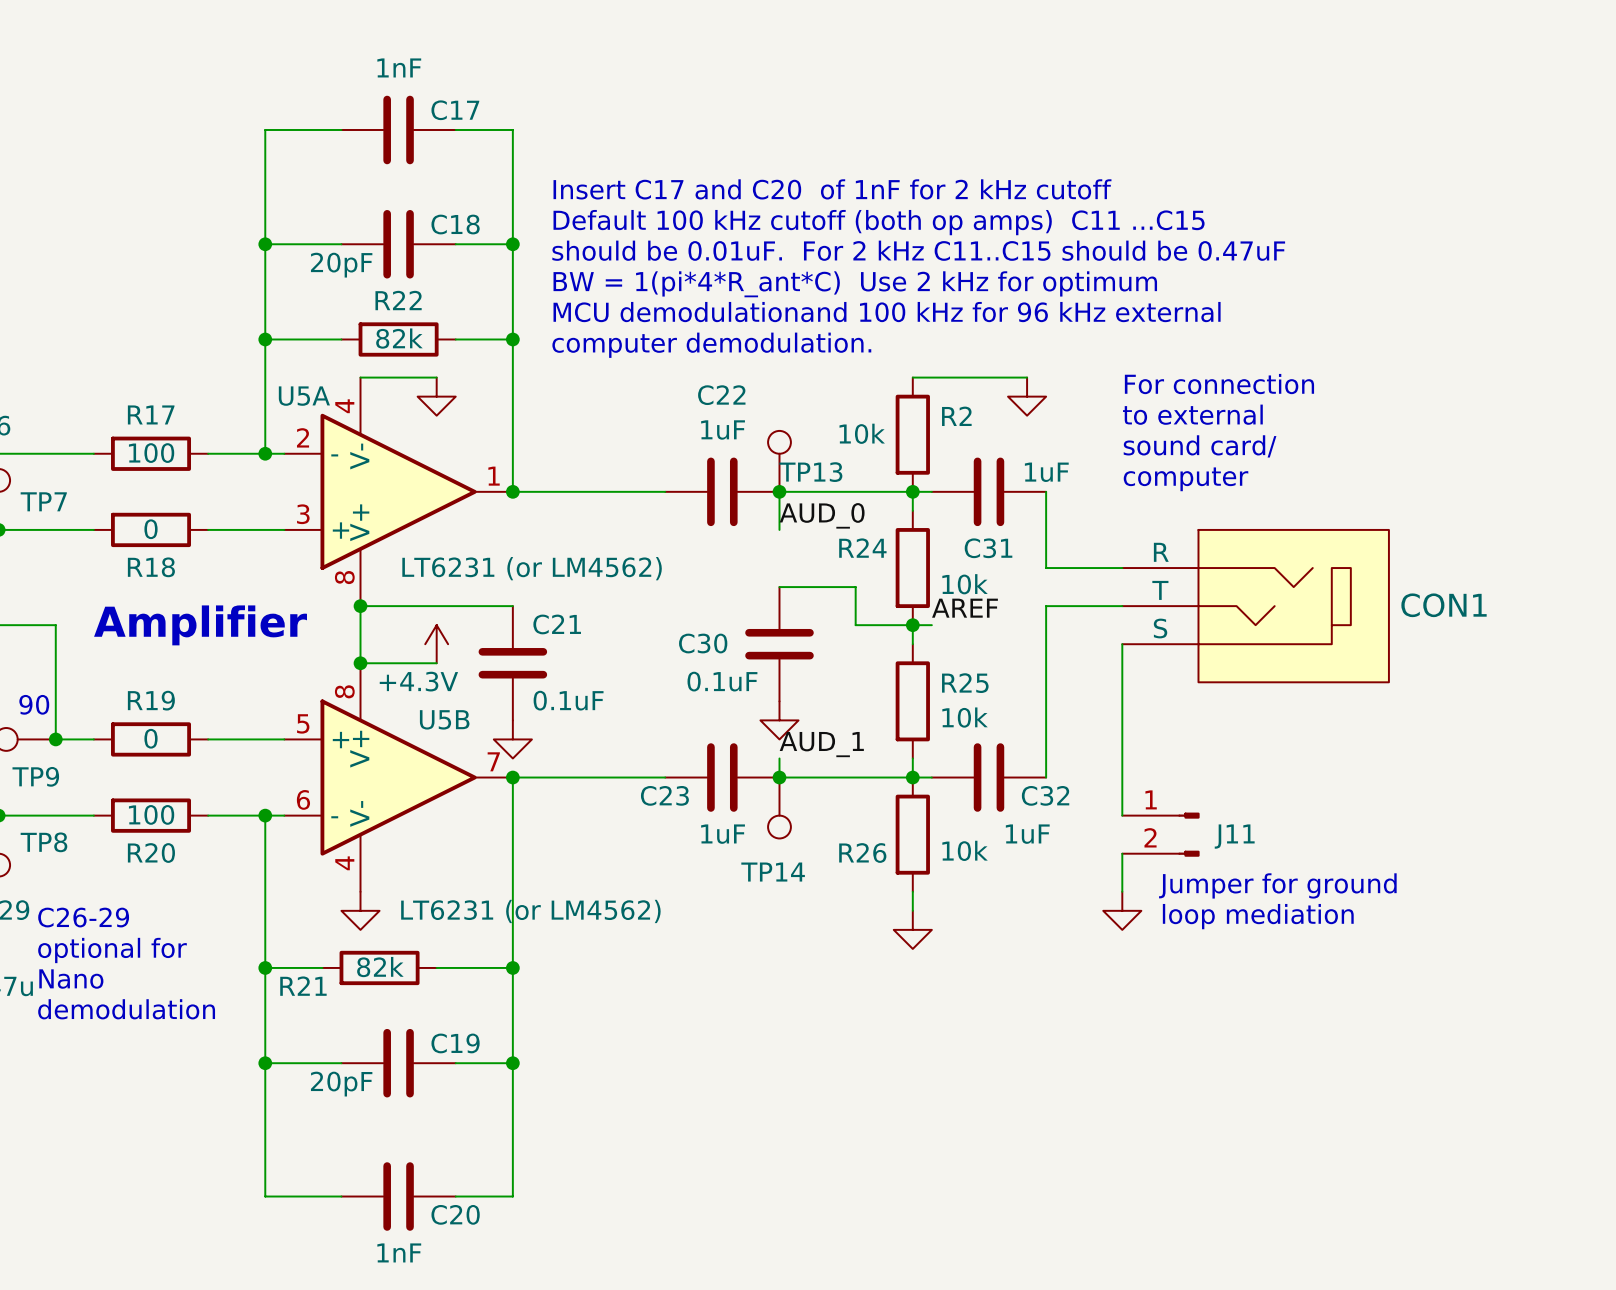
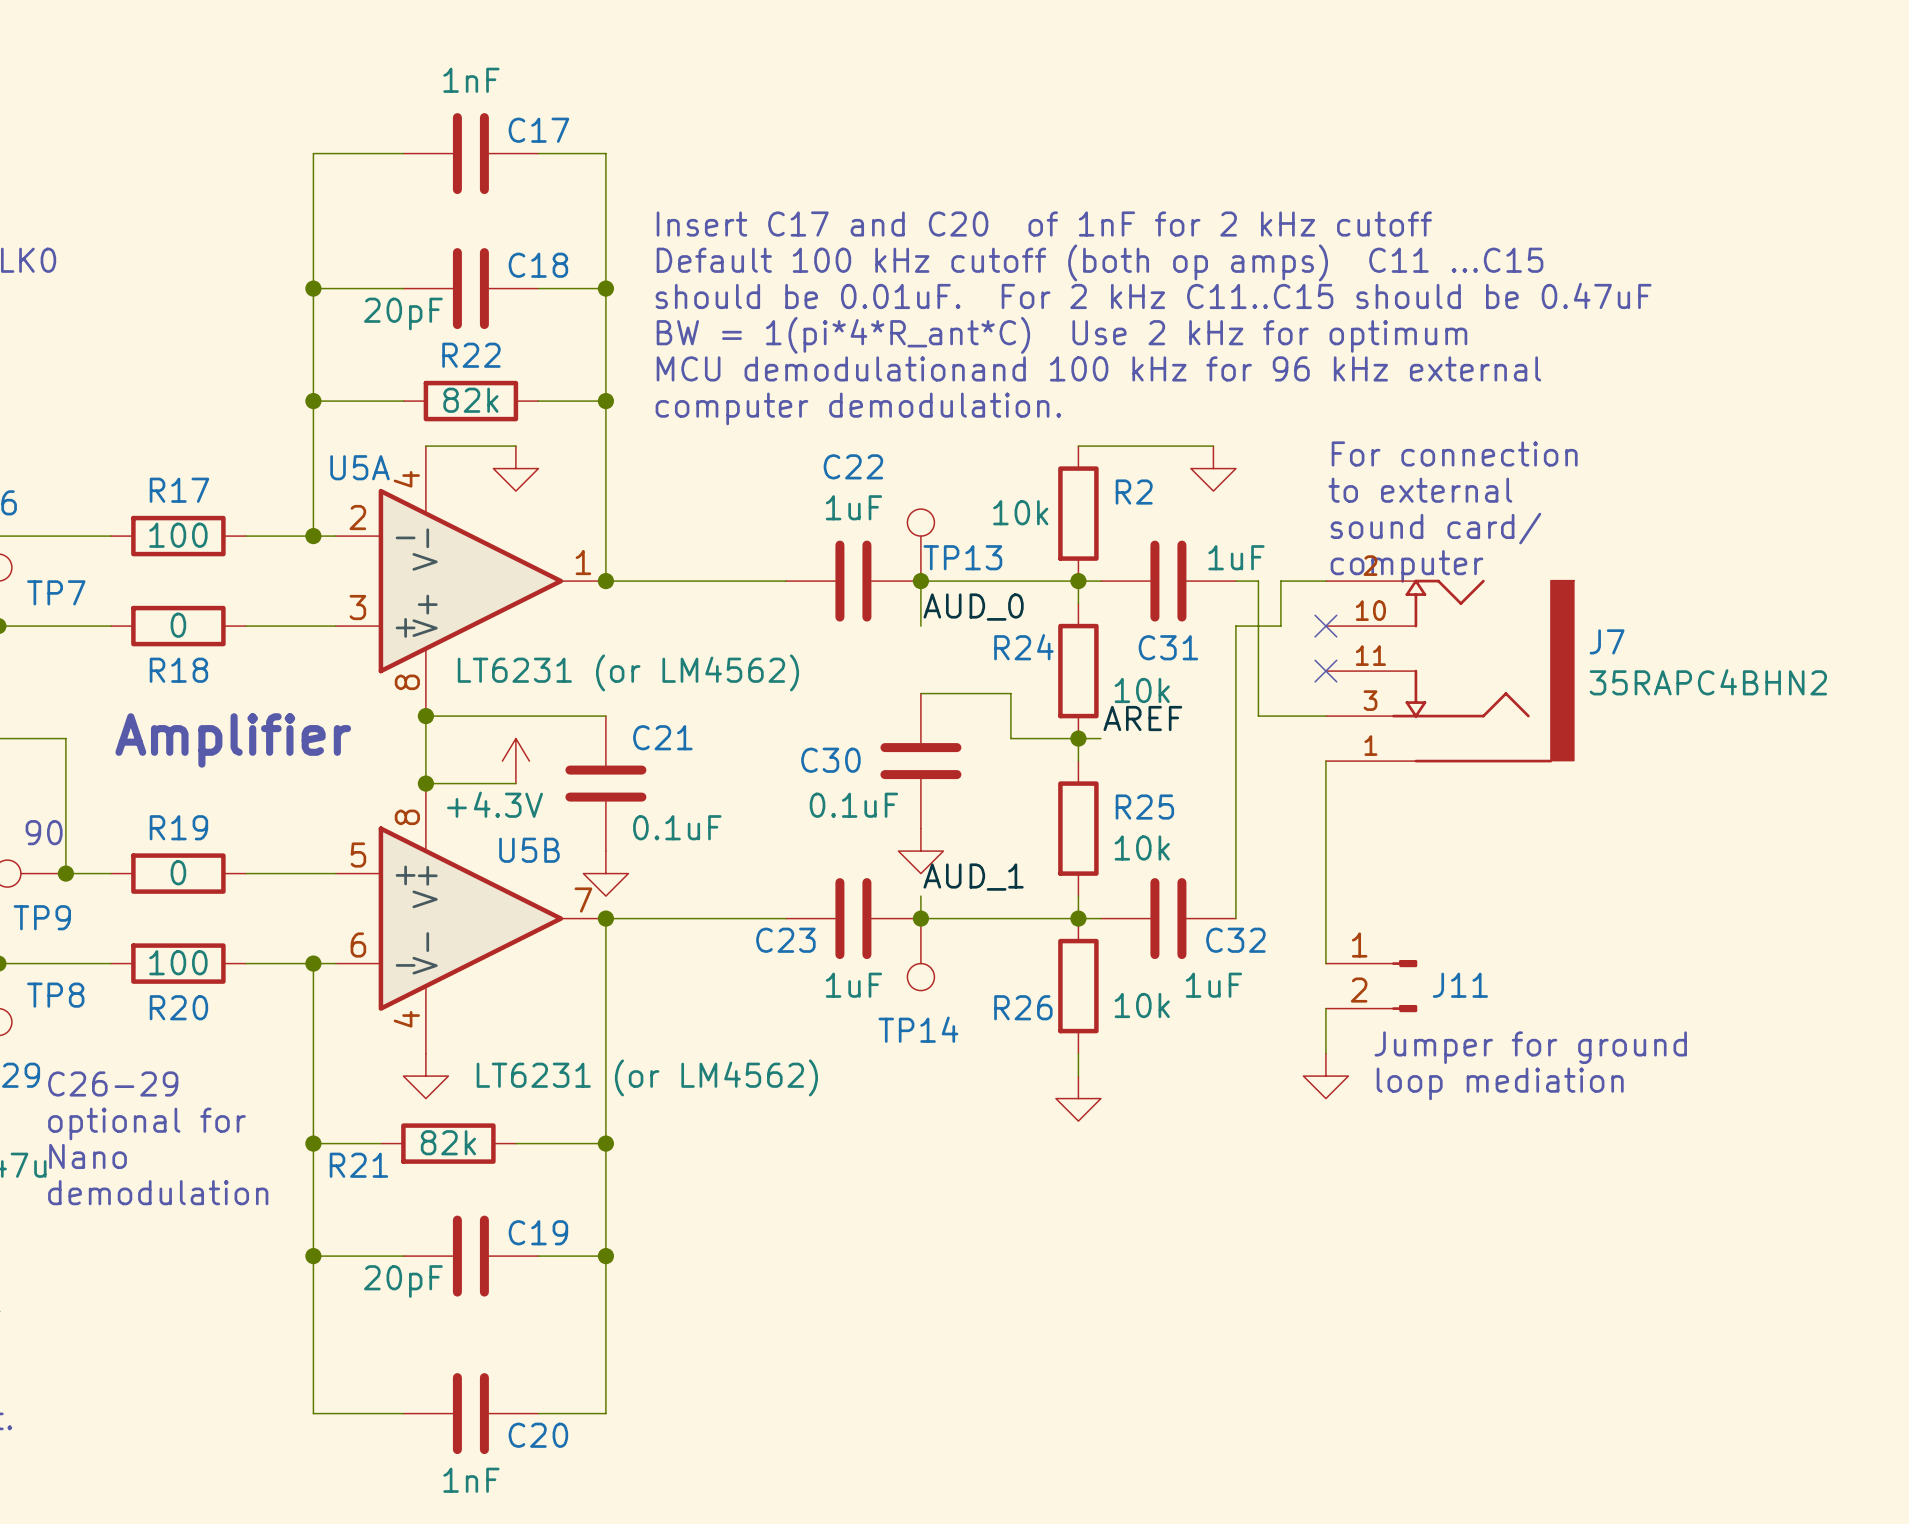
wire: (1046, 491) (1046, 529) -> (1325, 581) (1280, 581) (1280, 626) (1235, 626)
wire: none -> (1235, 581) (1258, 581) (1258, 716)
no-connect mark: none -> (1325, 626)
wire: (1046, 568) (1122, 568) -> none
no-connect mark: none -> (1325, 671)
J7: none -> 35RAPC4BHN2 (1449, 671)
wire: (1046, 606) (1065, 606) -> (1235, 716) (1235, 671)
CON1: (1255, 606) -> none

